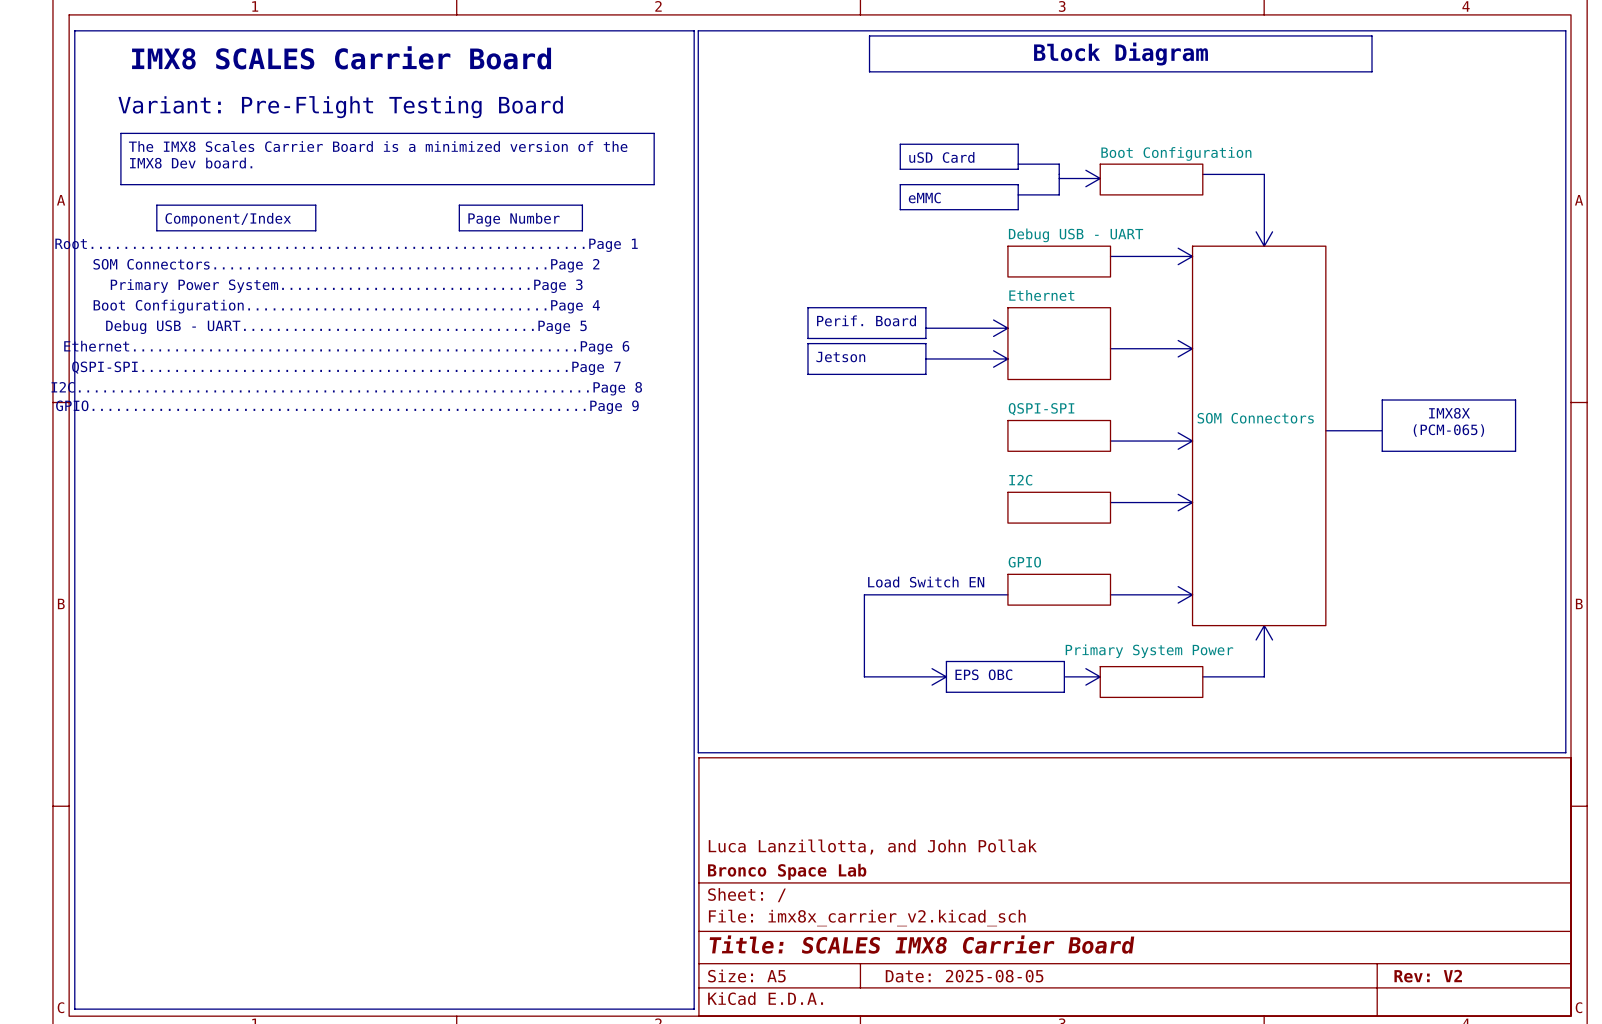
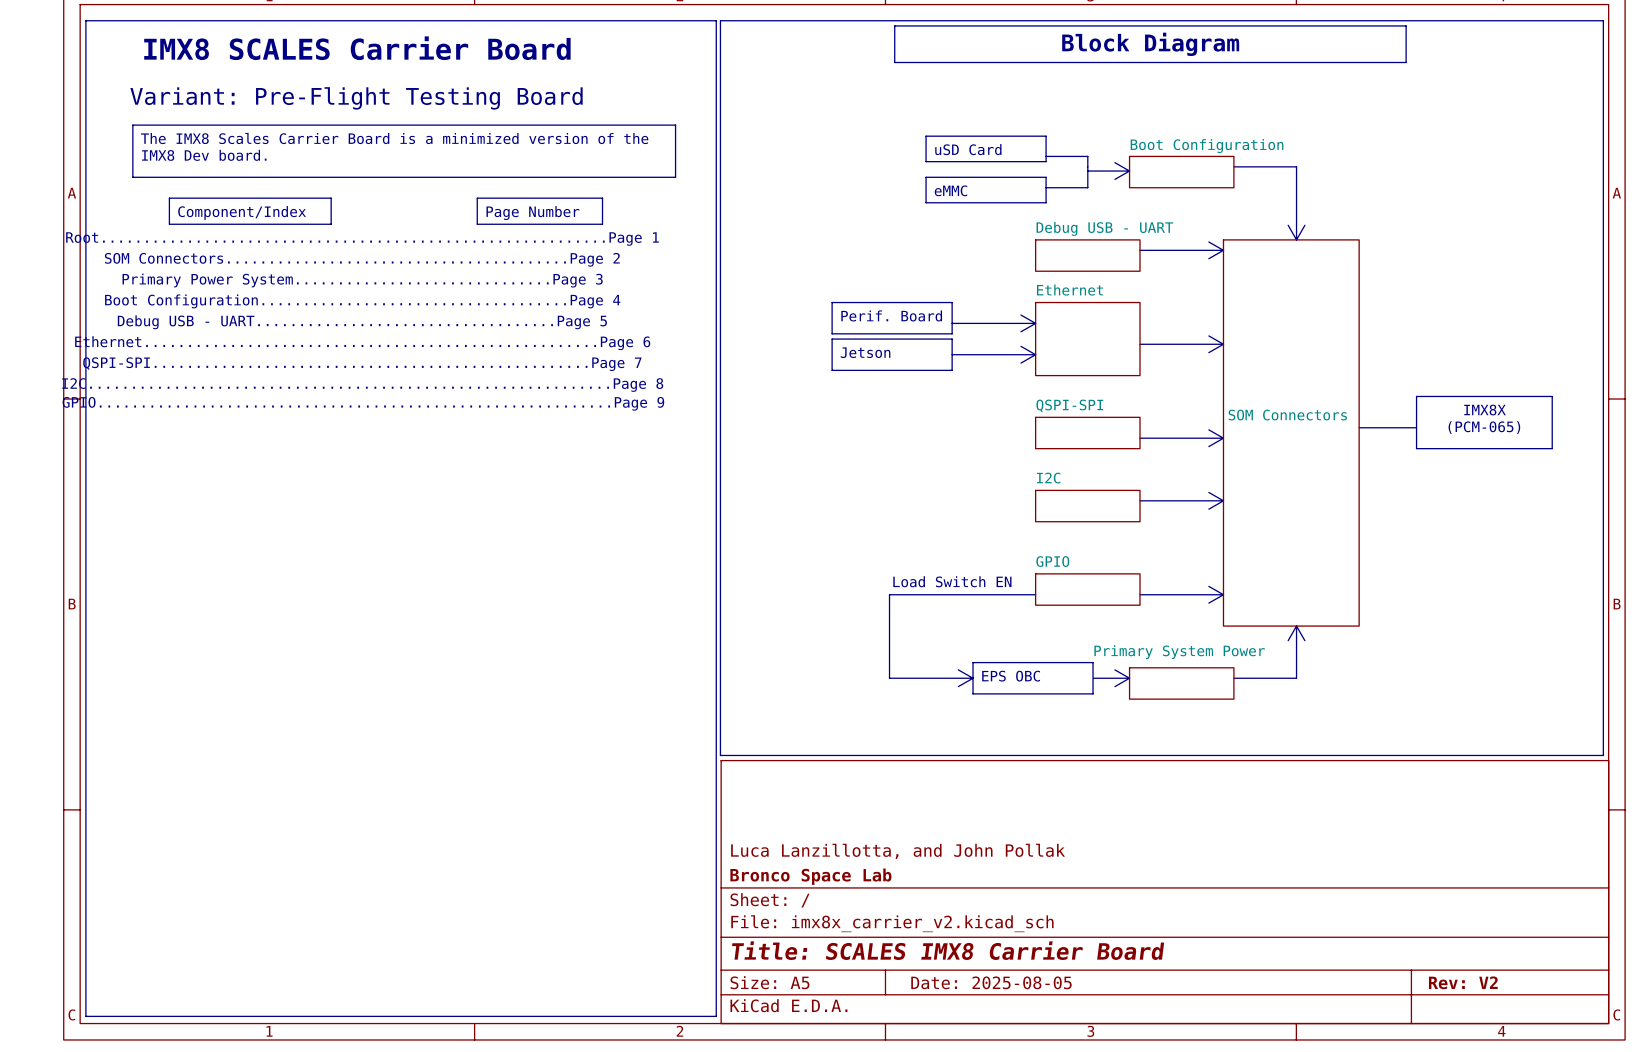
text: GPIO...........................................................Page 9 (347, 407) -> GPIO............................................................Page 9 (363, 403)

